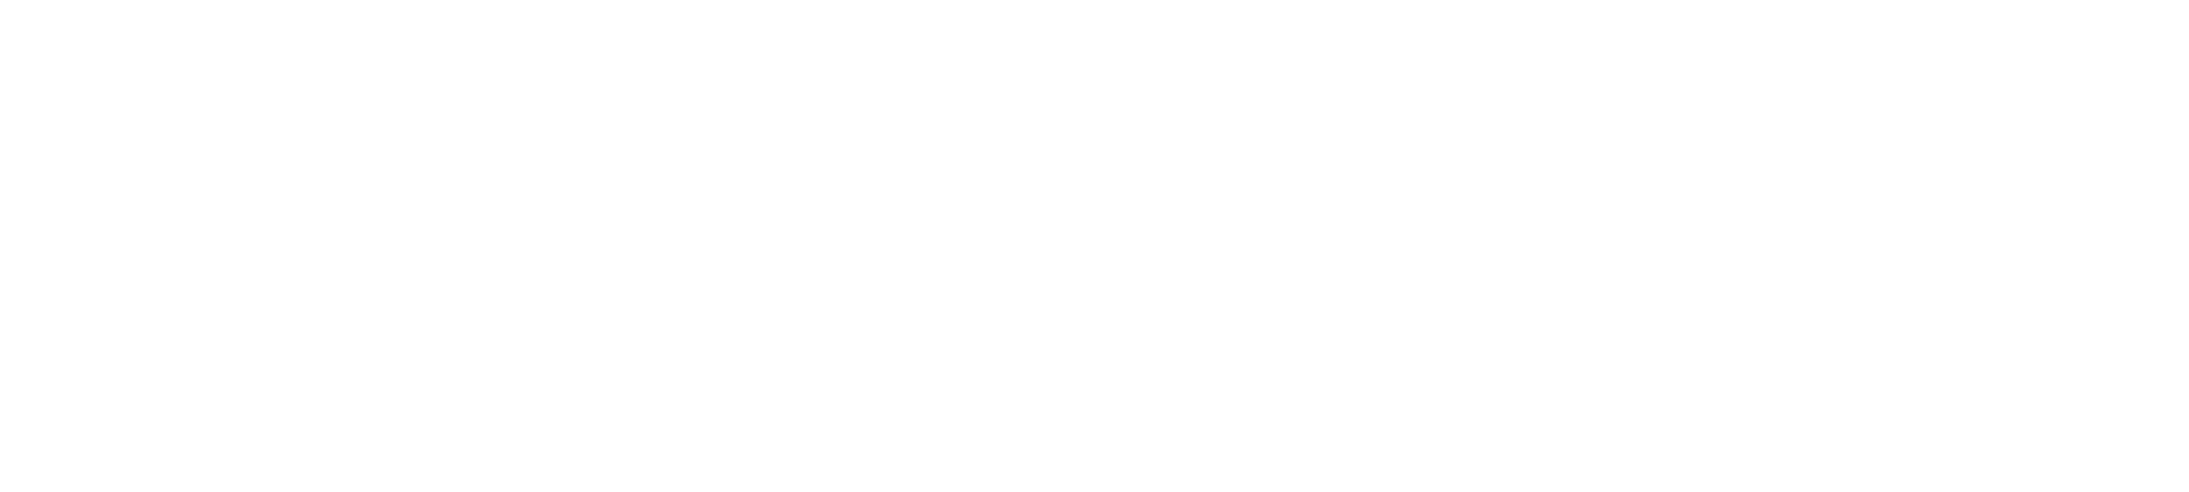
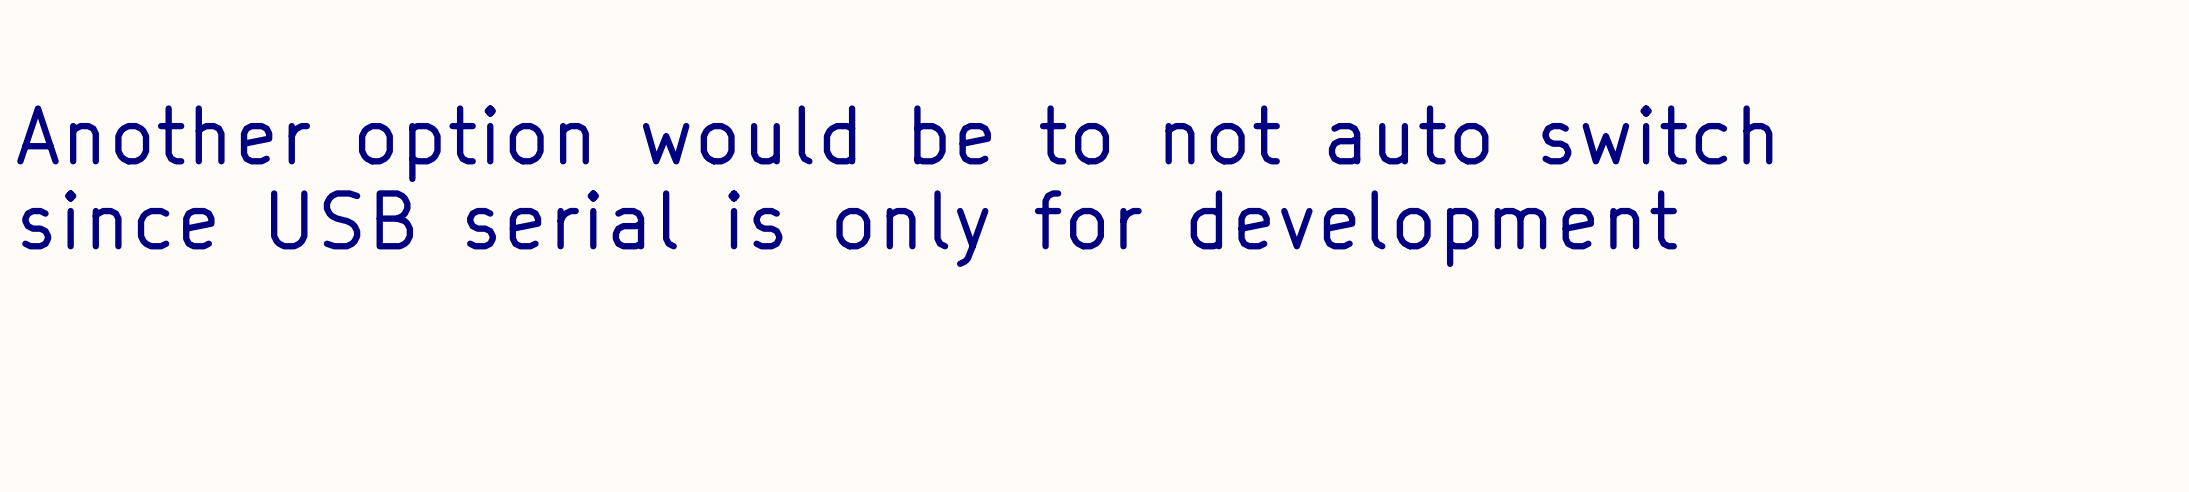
text: none -> Another option would be to not auto switch (894, 143)
text: none -> since USB serial is only for development (849, 228)

